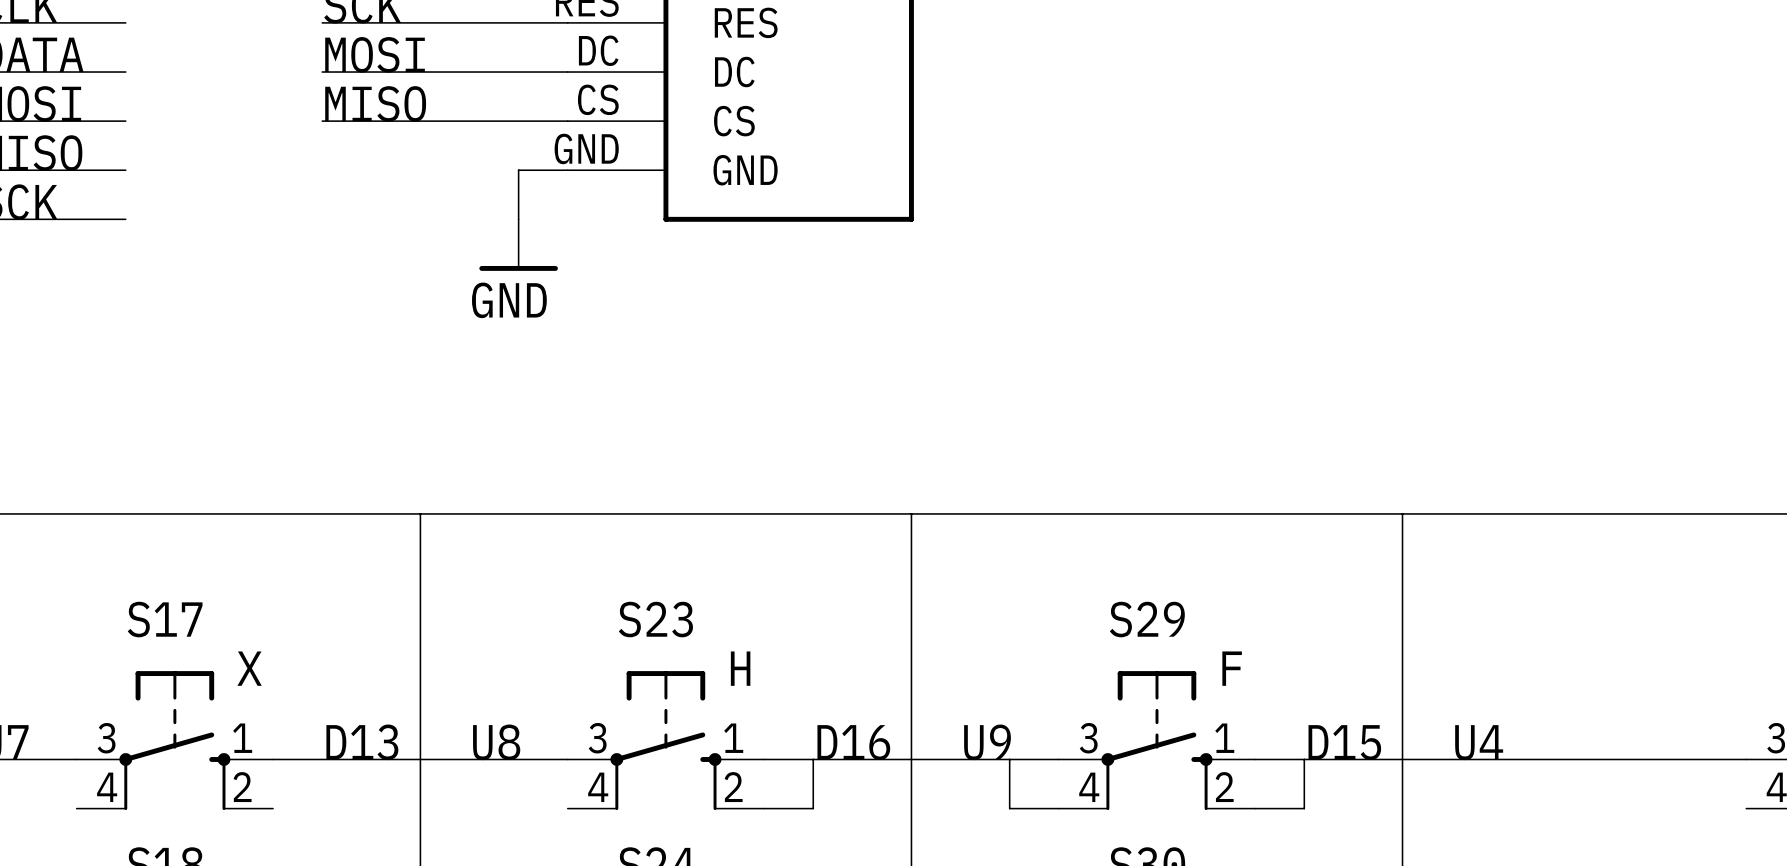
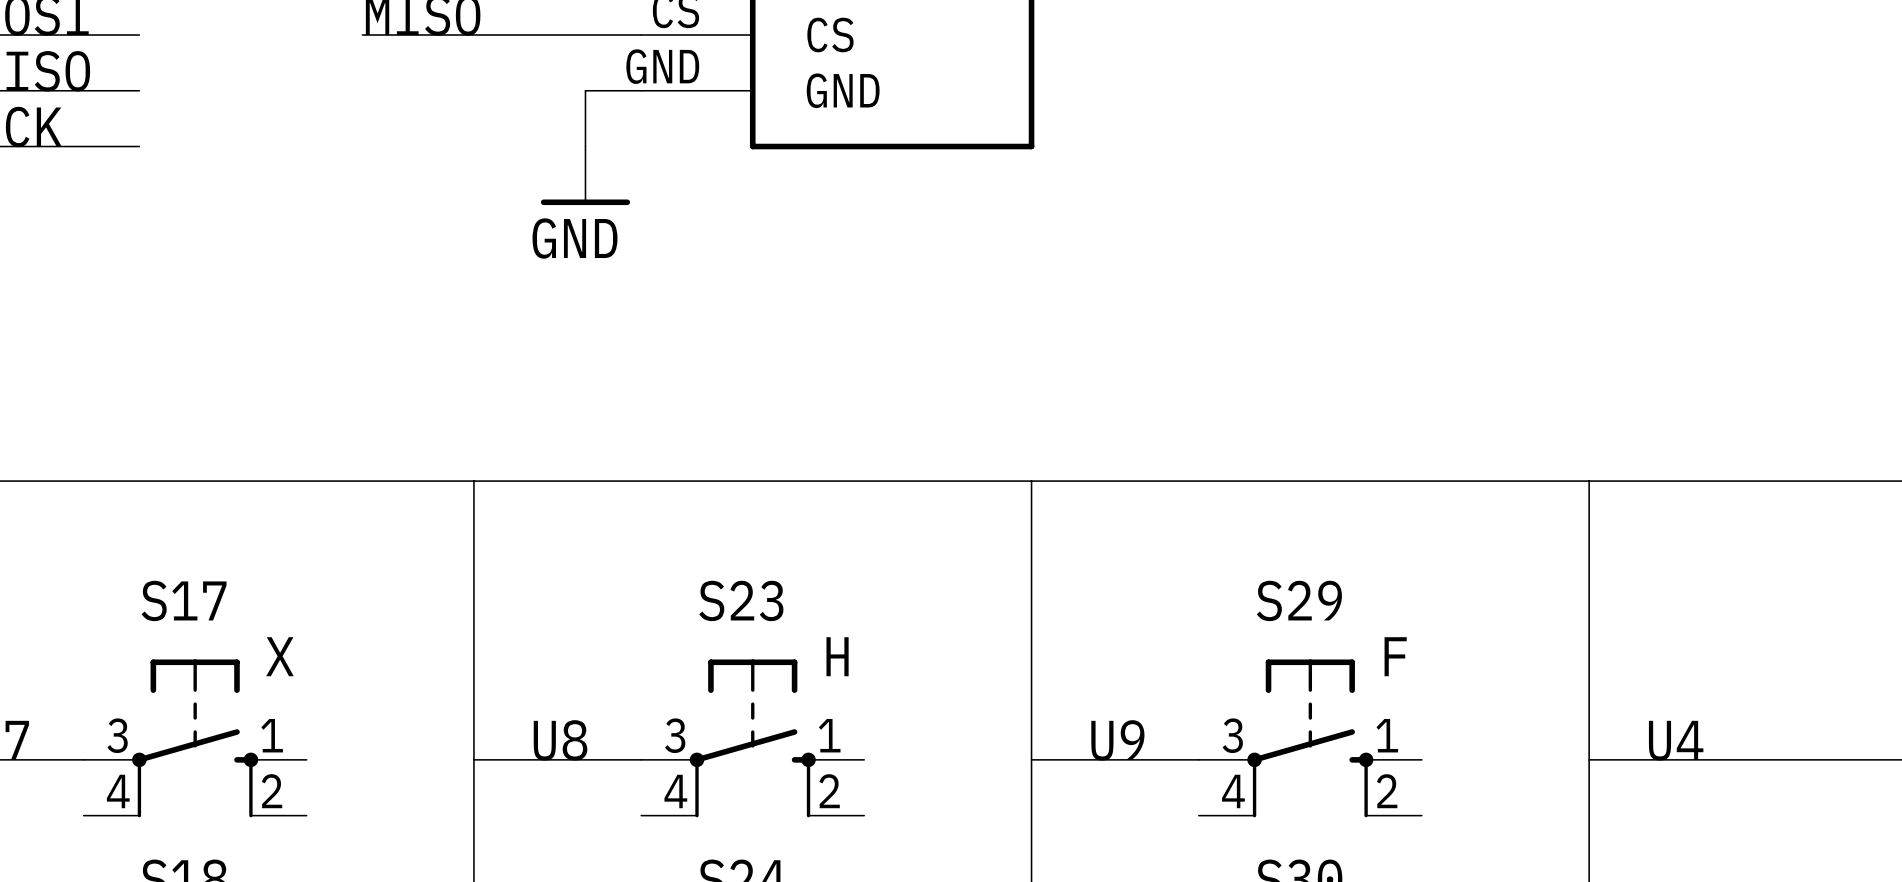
label: D13 (362, 742) -> none
label: D16 (853, 742) -> none
label: D15 (1344, 742) -> none
wire: (273, 759) (420, 759) -> none
wire: (764, 759) (911, 759) -> none
wire: (813, 759) (813, 808) (764, 808) -> none
wire: (1009, 759) (1009, 808) (1058, 808) -> none
wire: (1255, 759) (1402, 759) -> none
wire: (1304, 759) (1304, 808) (1255, 808) -> none

